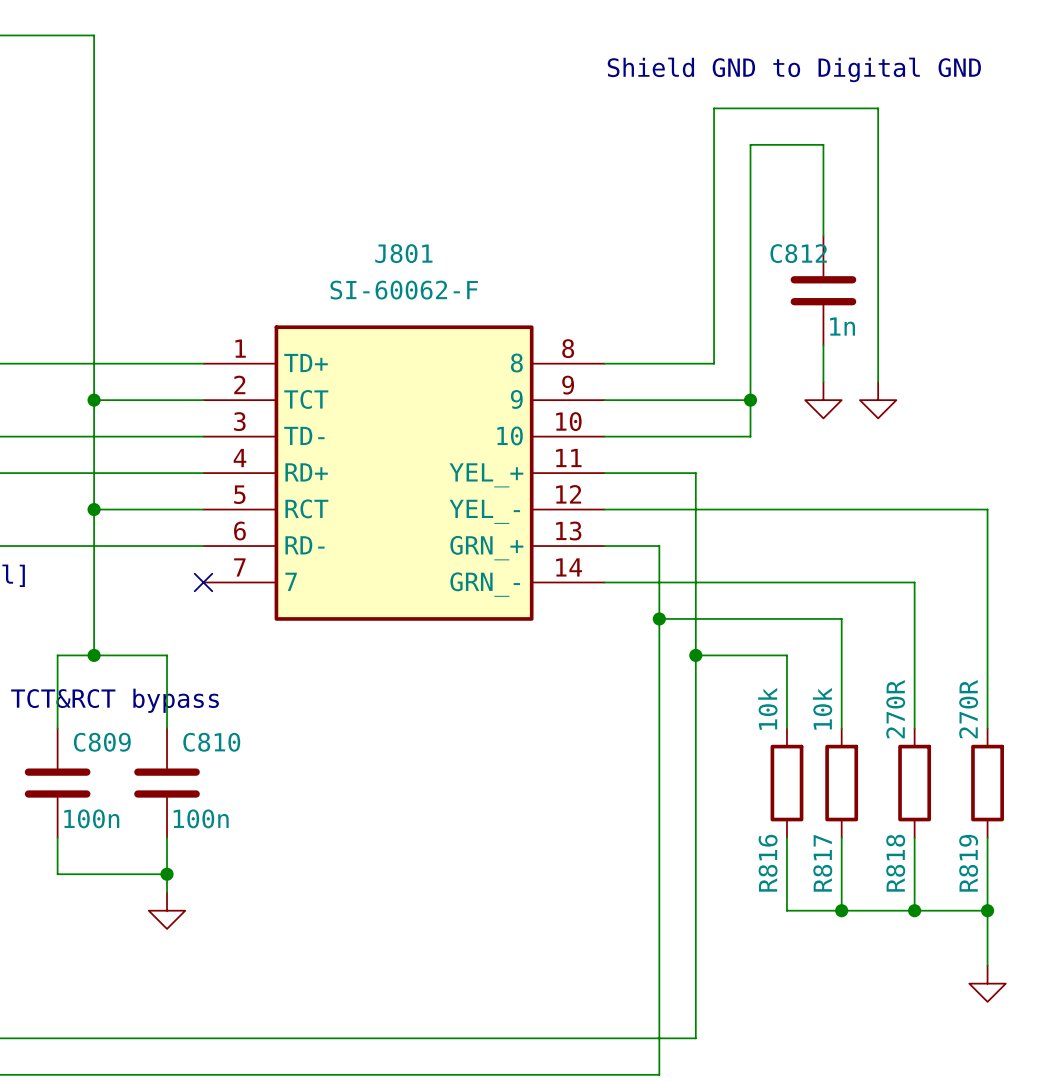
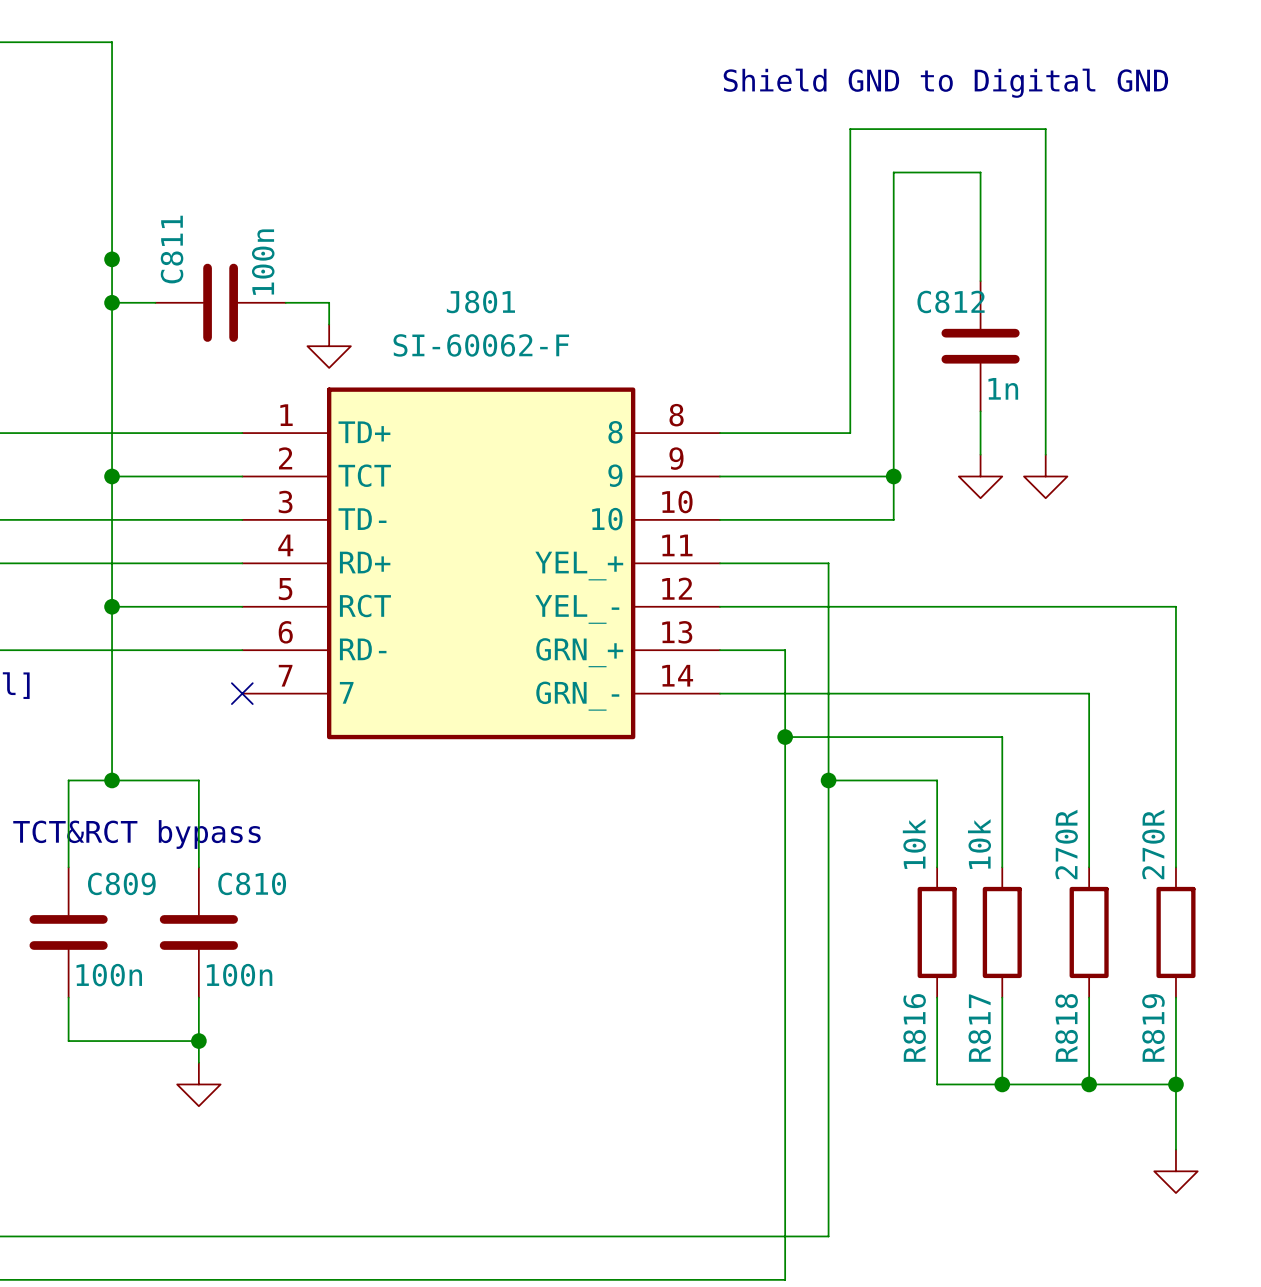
junction: none -> (112, 259)
wire: none -> (112, 302) (155, 302)
junction: none -> (112, 302)
C811: none -> 100n (220, 302)
wire: none -> (285, 302) (329, 302) (329, 324)
power symbol: none -> (329, 346)

